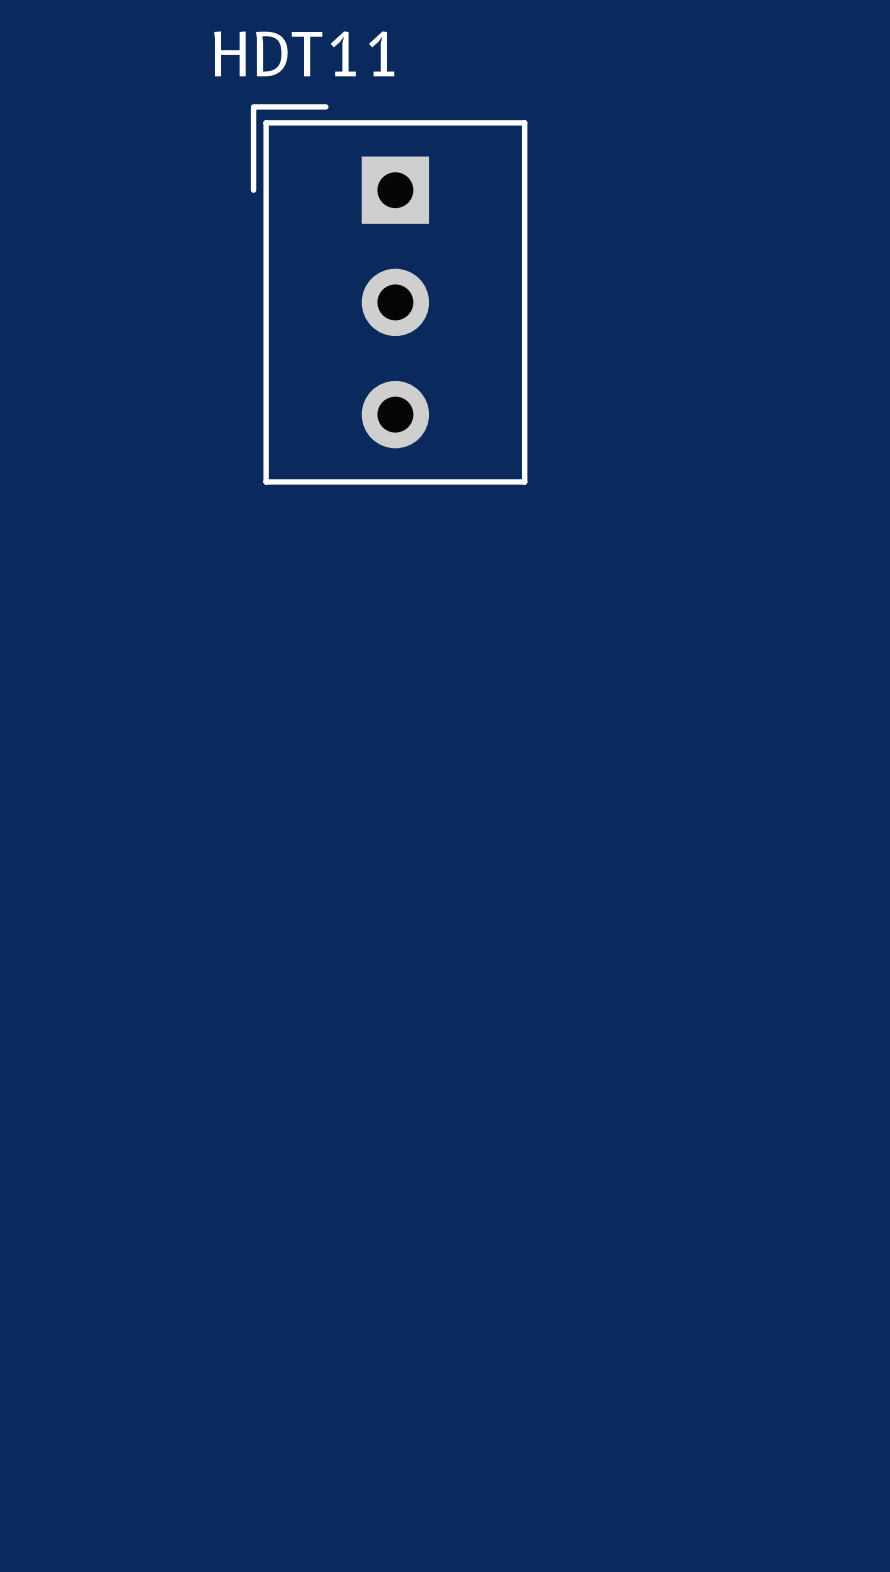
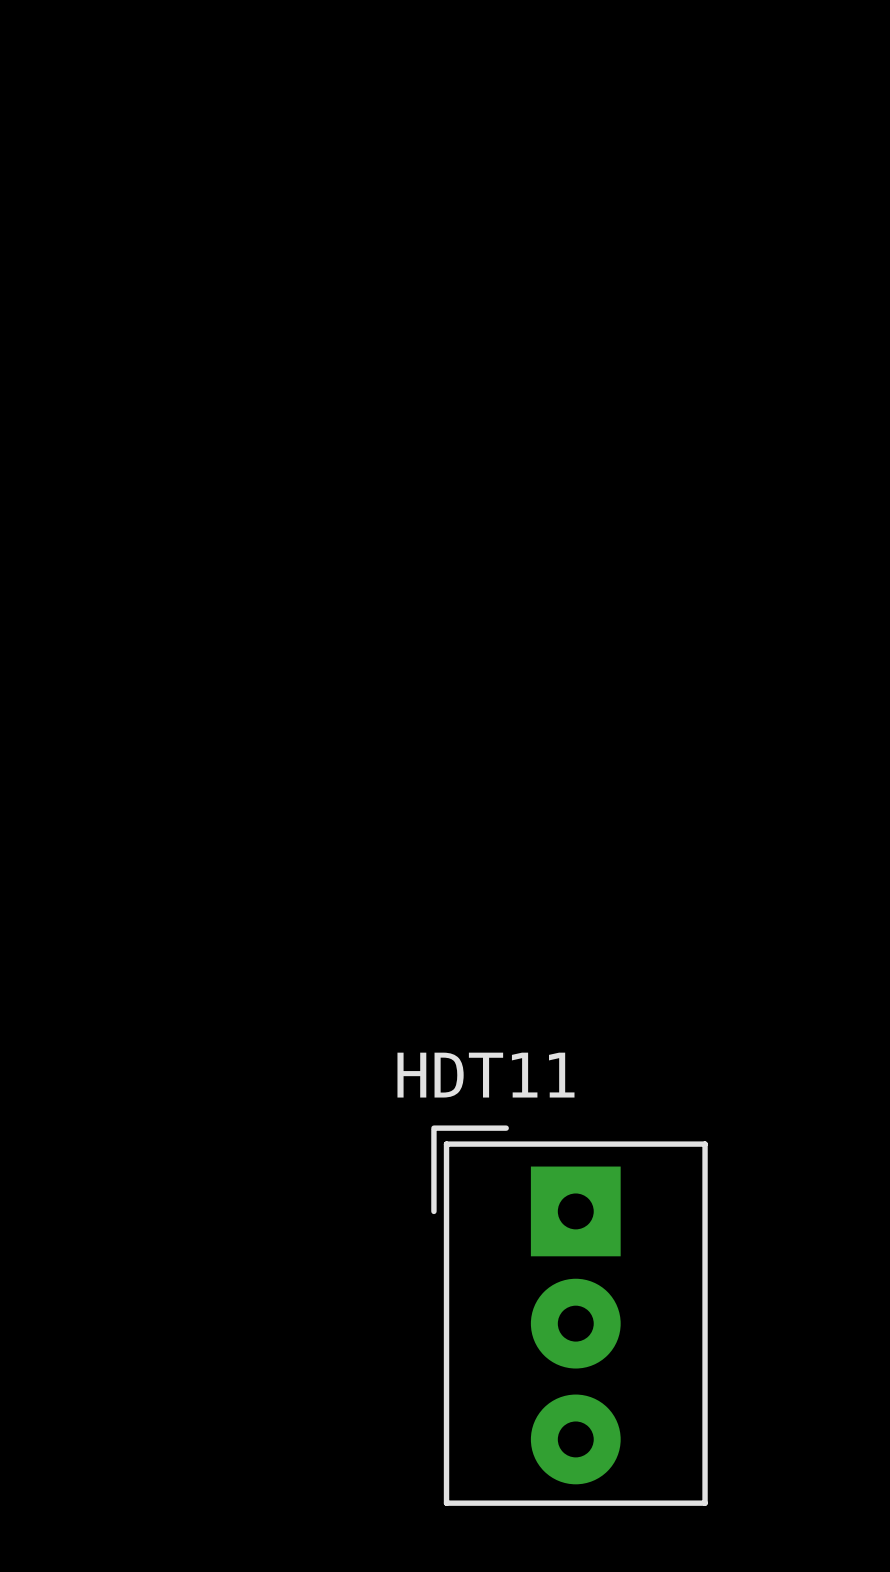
HDT11 footprint: [250, 104, 528, 485] -> [431, 1125, 708, 1506]

